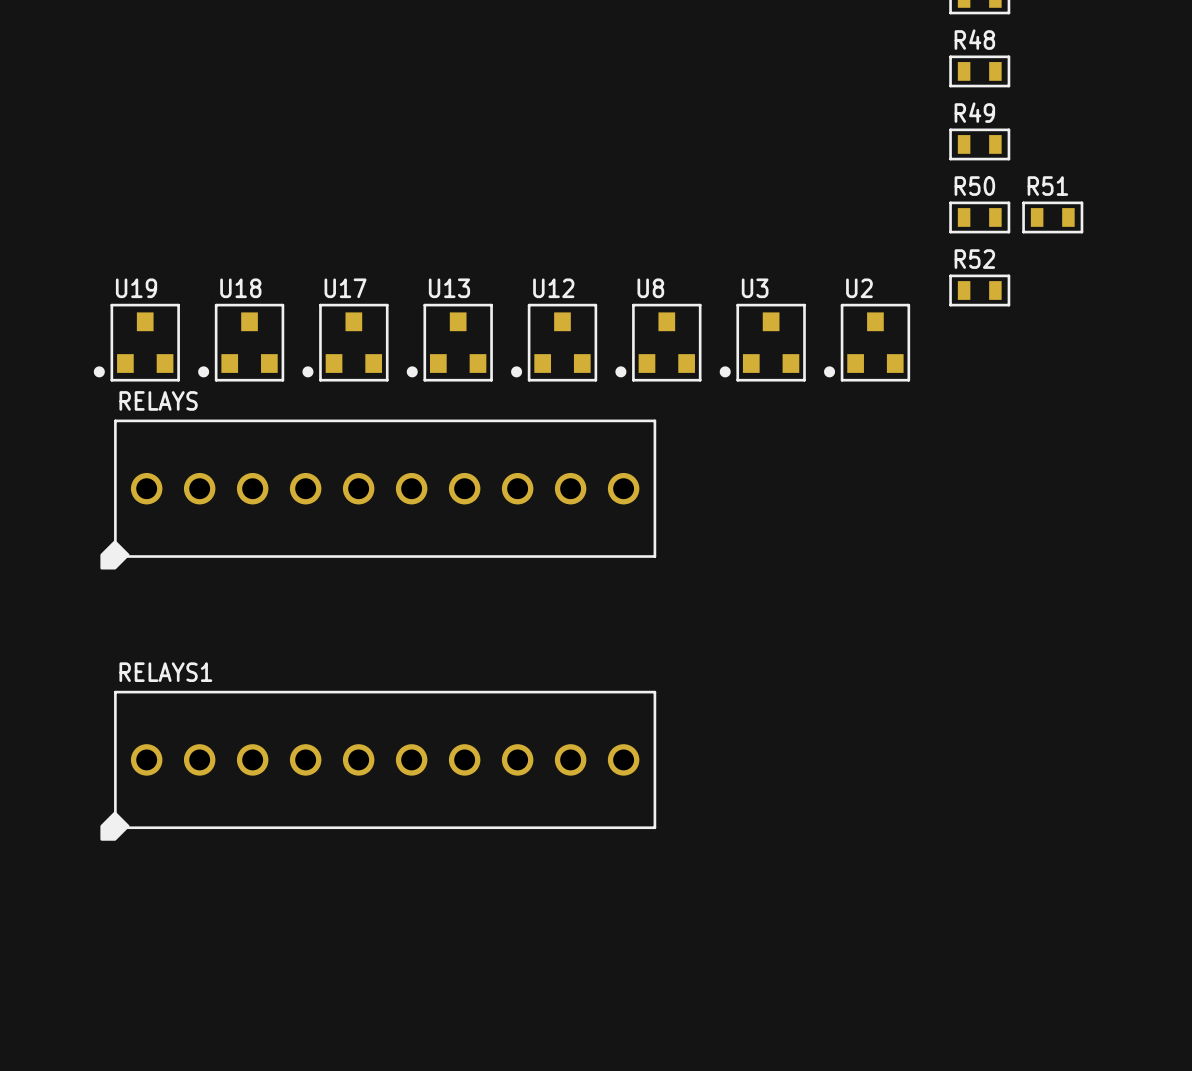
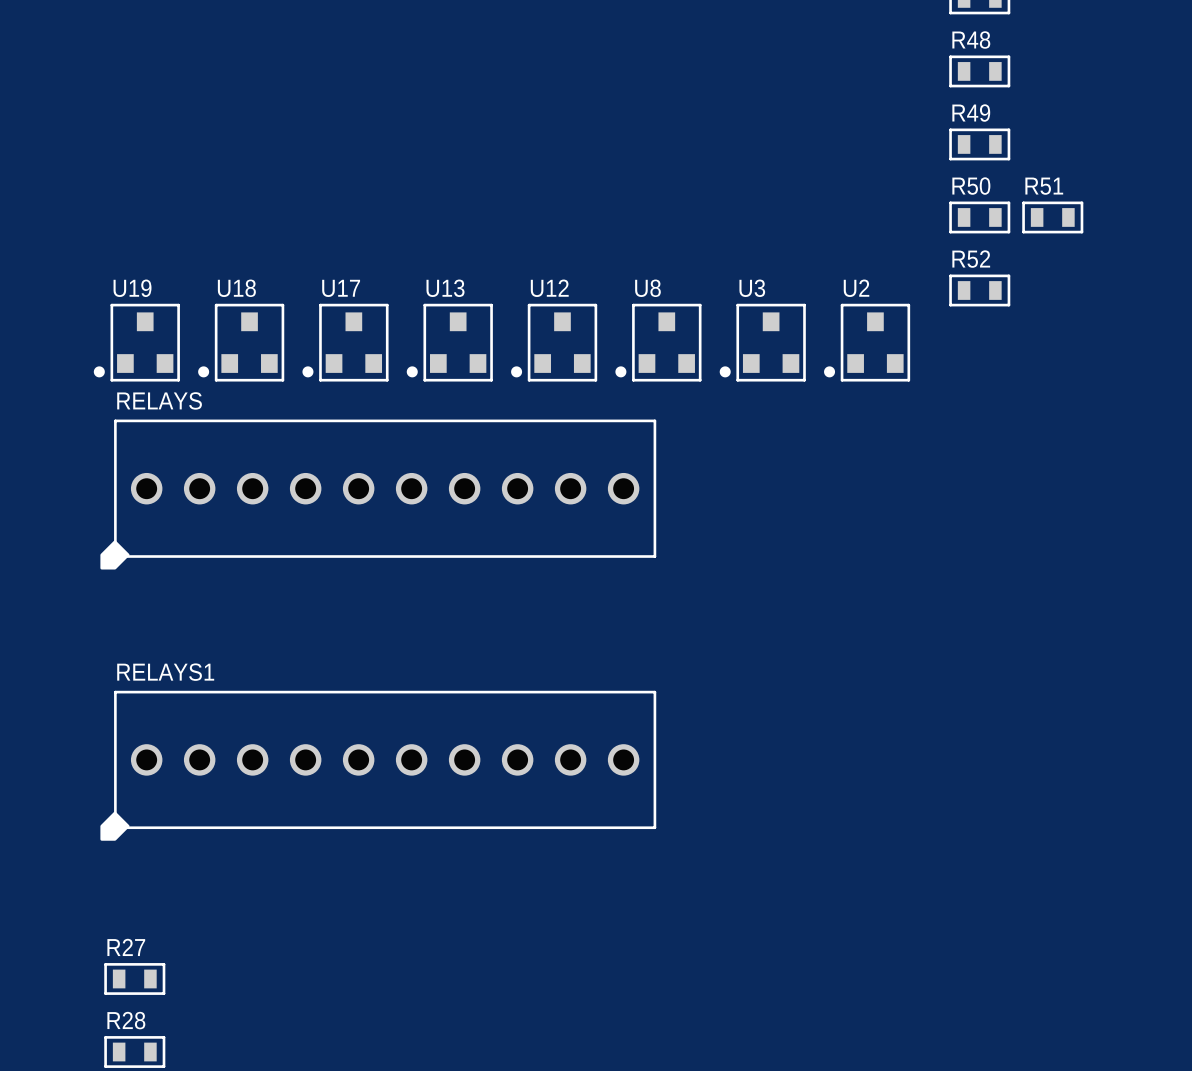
R27: none -> (134, 978)
R28: none -> (134, 1052)

